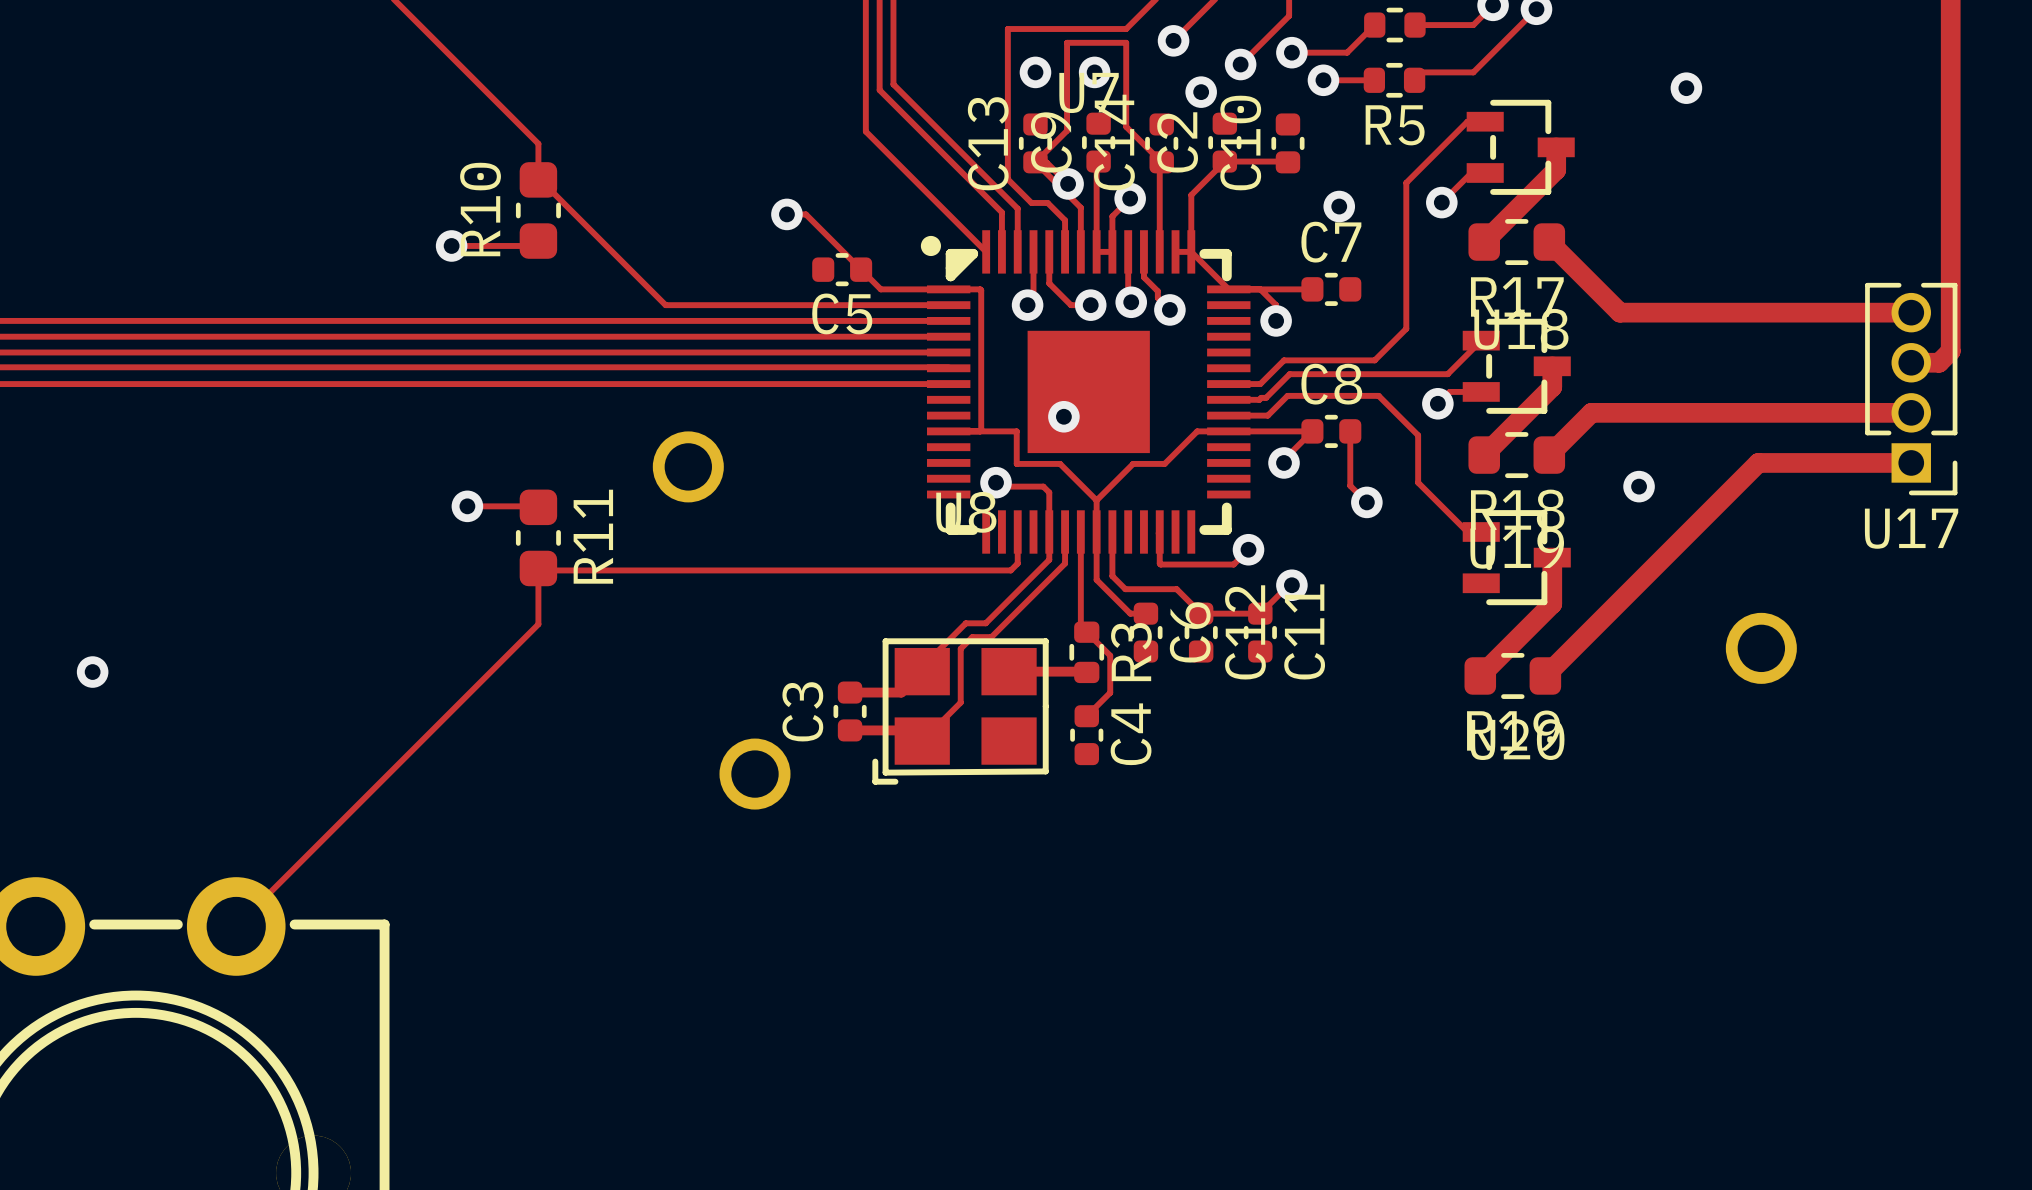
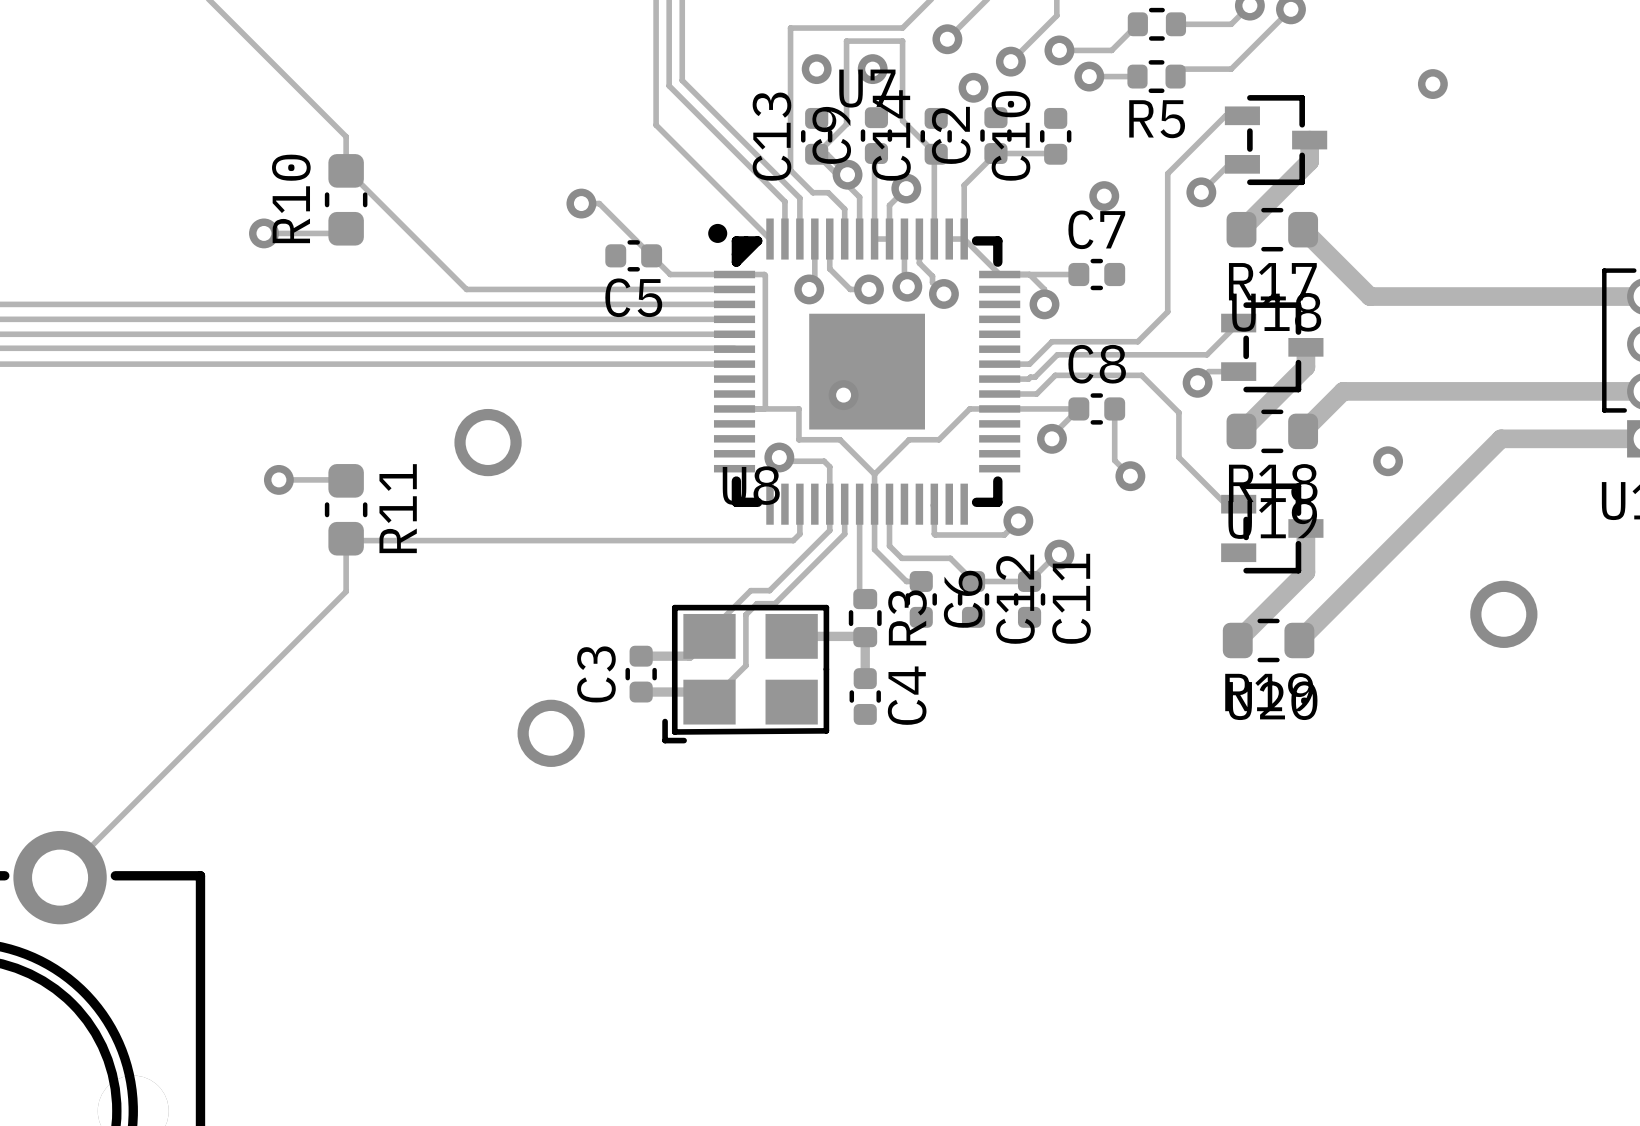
track: (1086, 632) (1110, 655) (1110, 692) (1086, 716) -> (865, 637) (865, 678)

